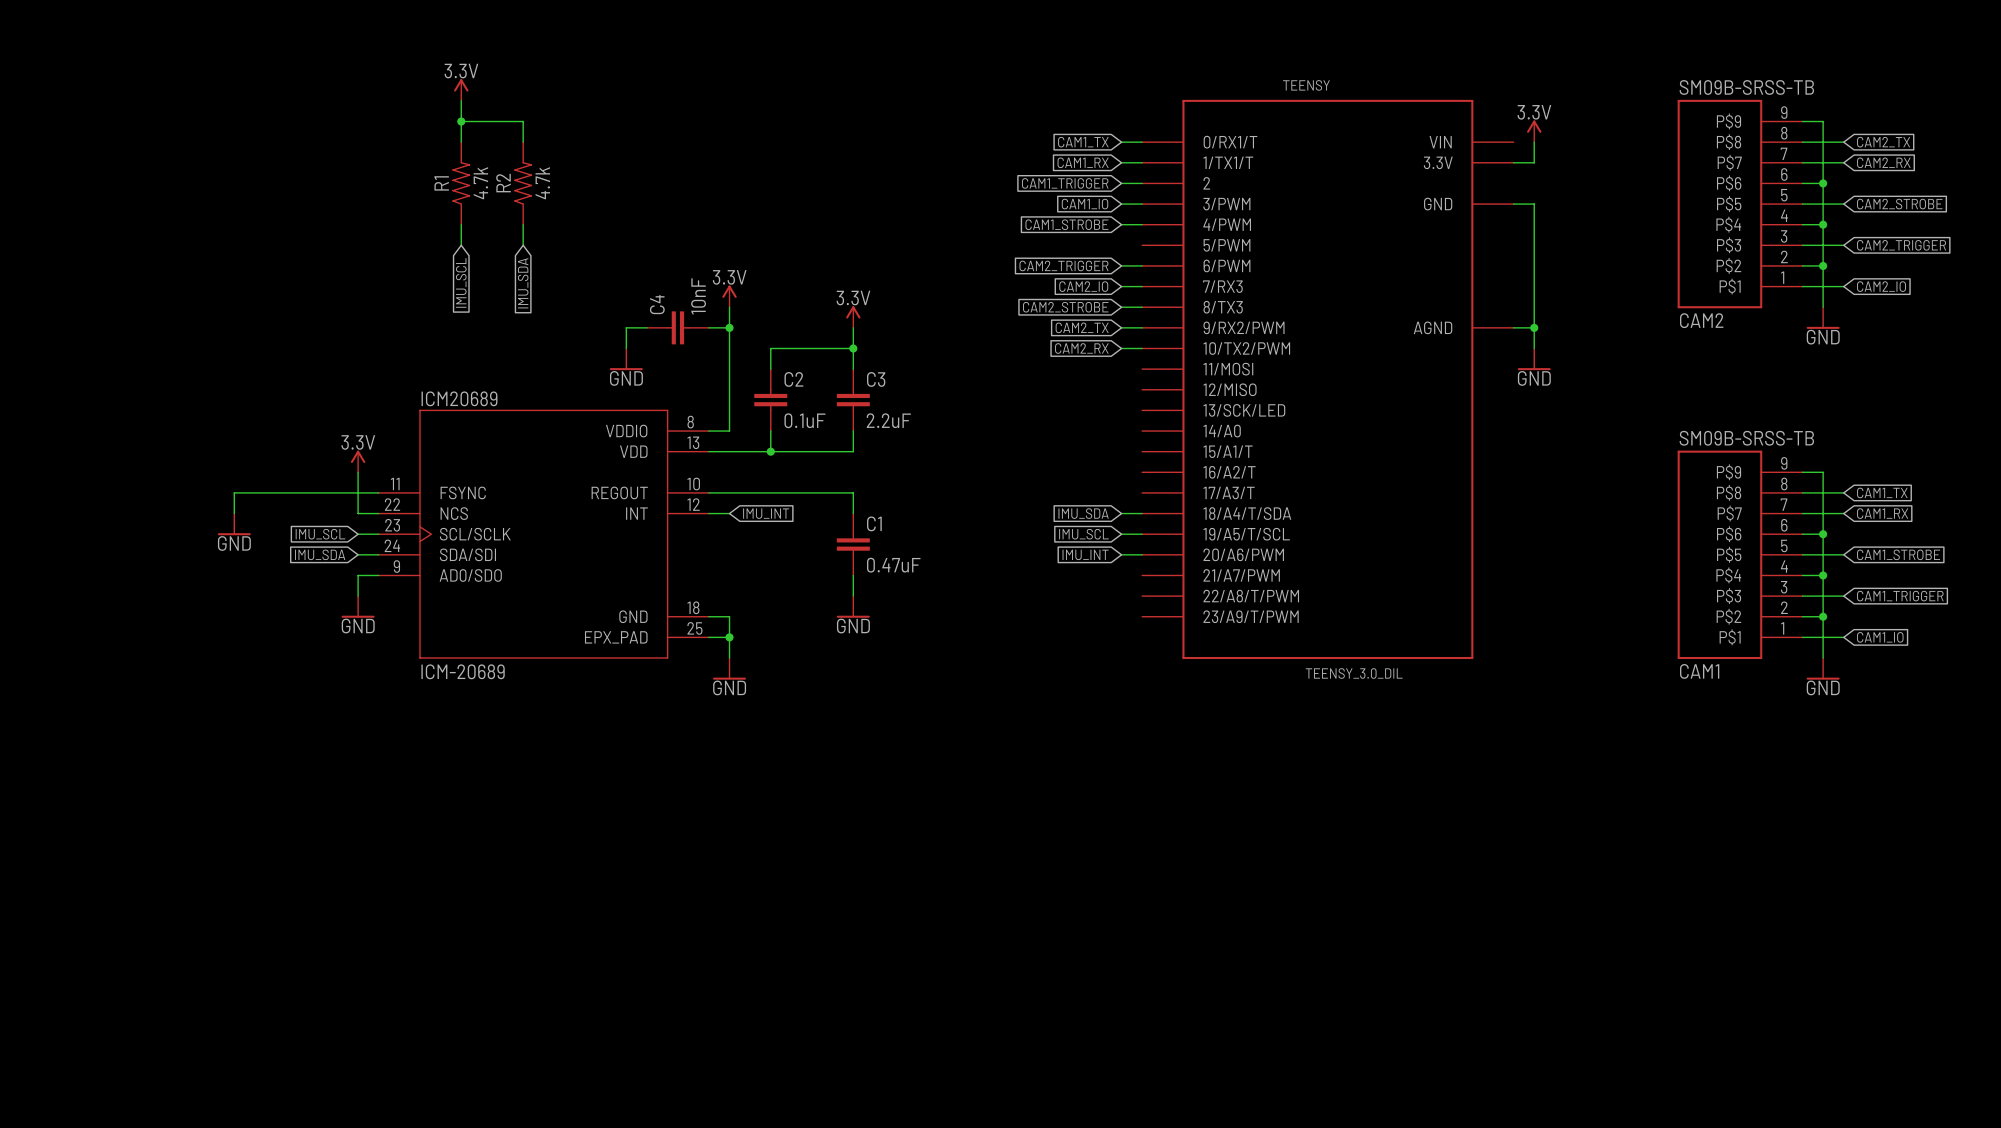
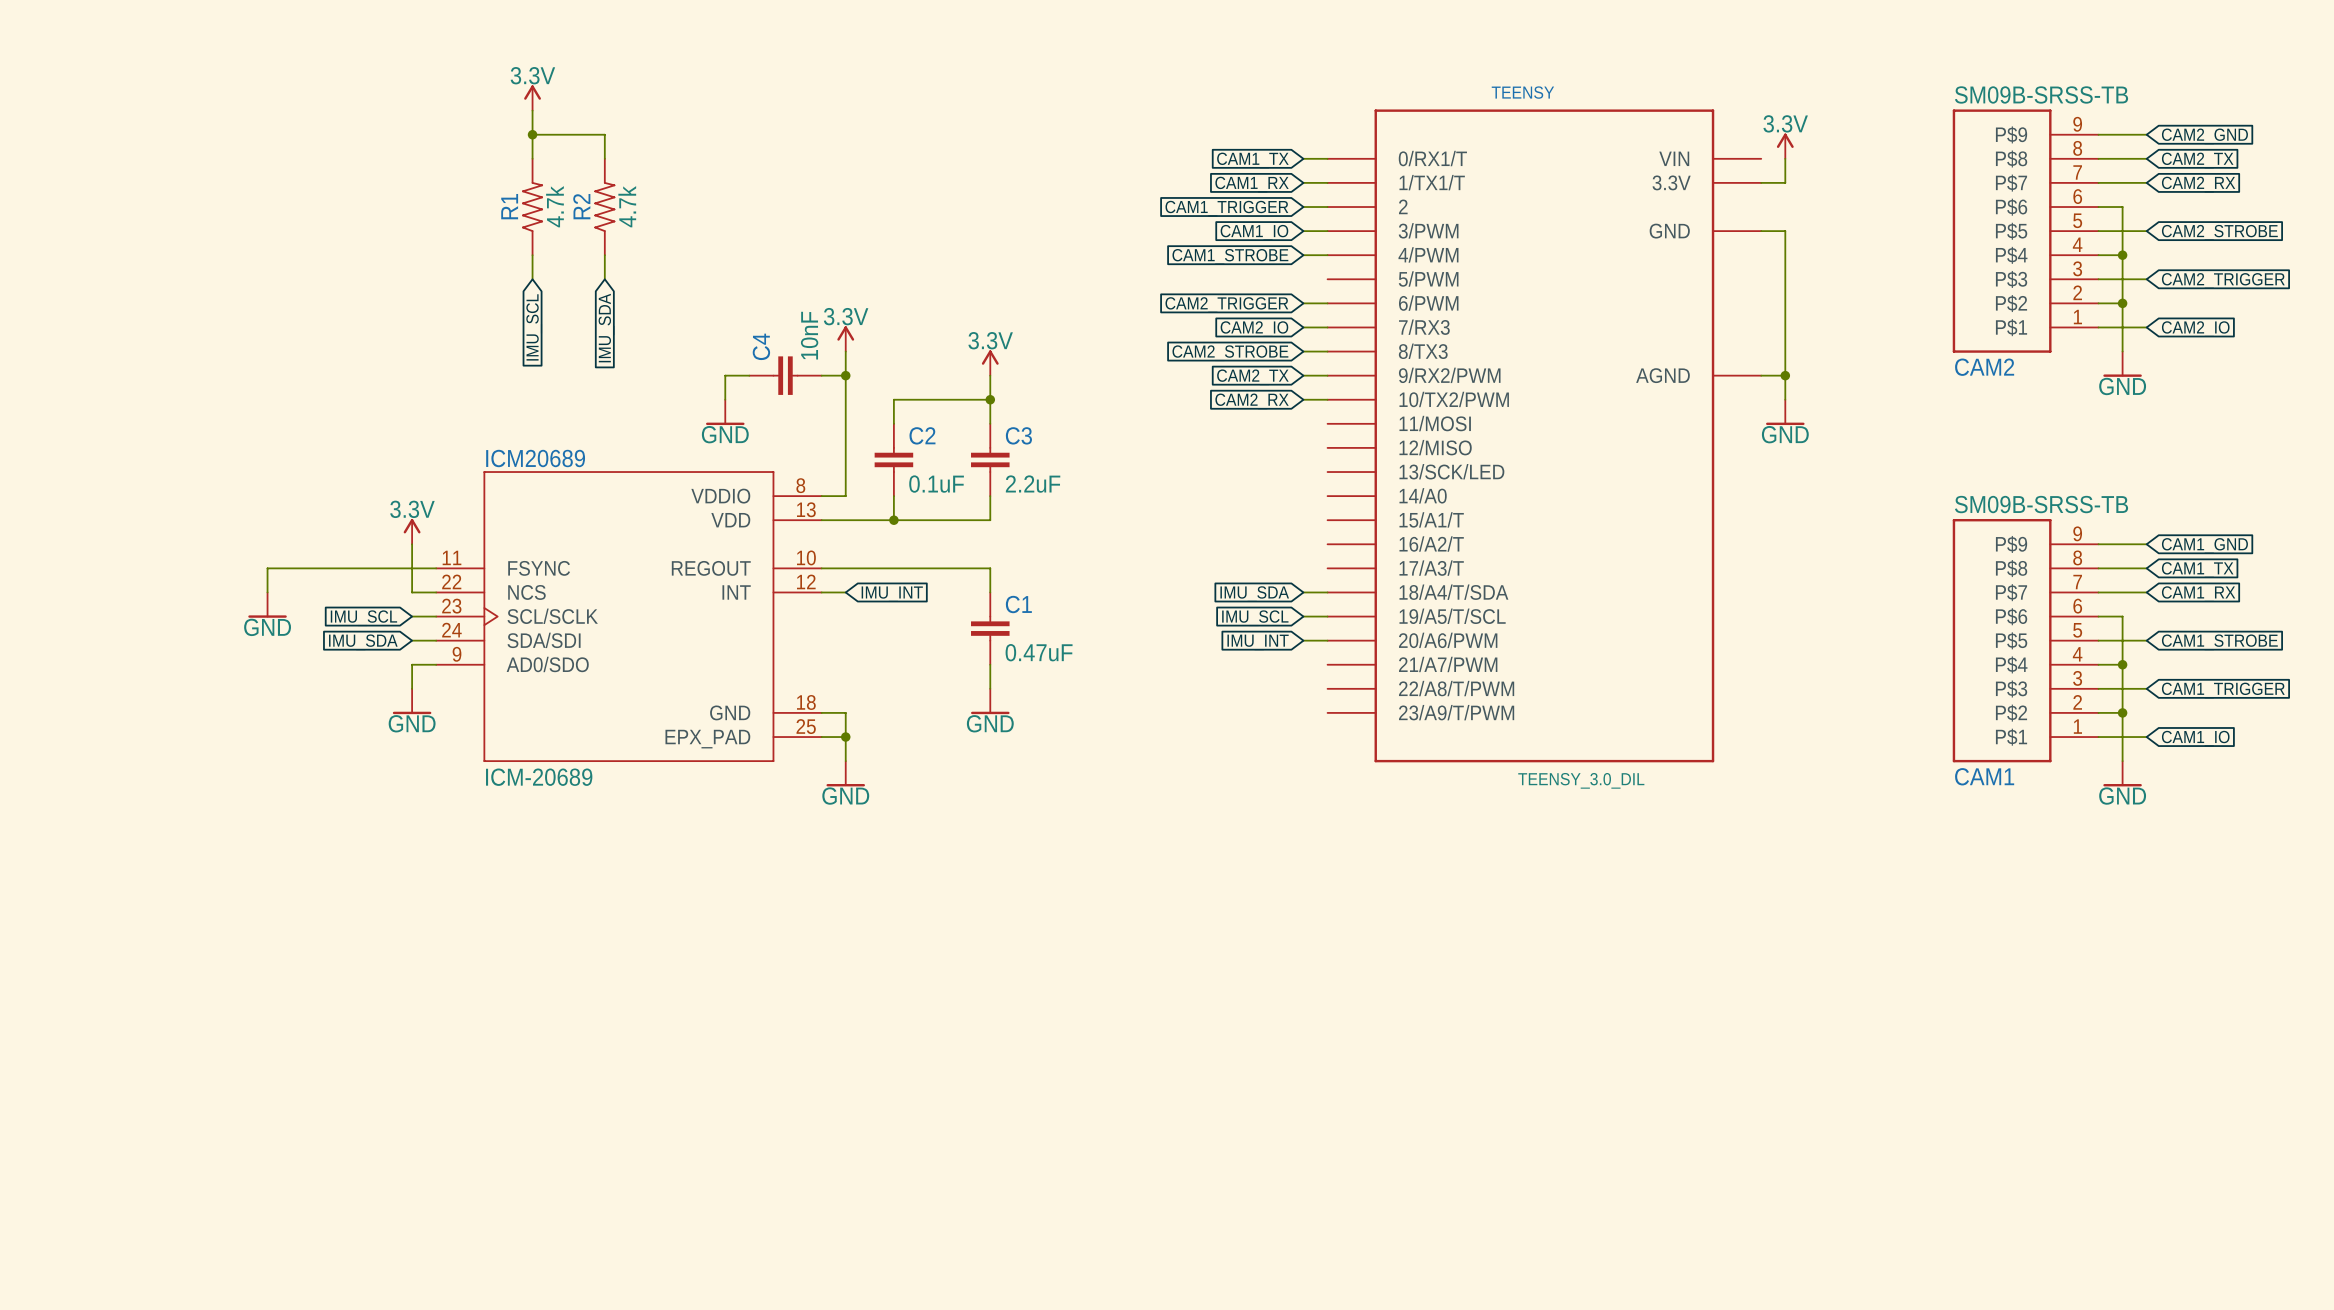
wire: (1823, 121) (1823, 183) -> (2122, 134) (2146, 134)
global label: none -> CAM2_GND (2204, 136)
junction: (1823, 183) -> none
wire: (1823, 472) (1823, 534) -> (2122, 544) (2146, 544)
global label: none -> CAM1_GND (2204, 545)
junction: (1823, 534) -> none

